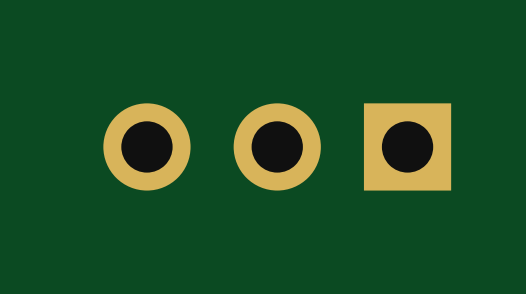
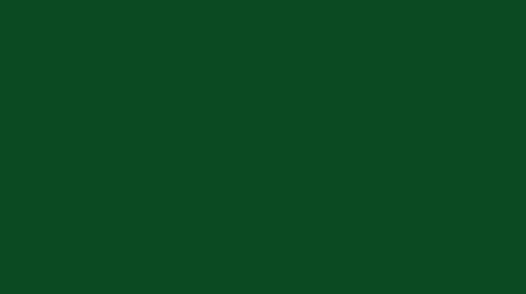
part: (277, 146) -> none

